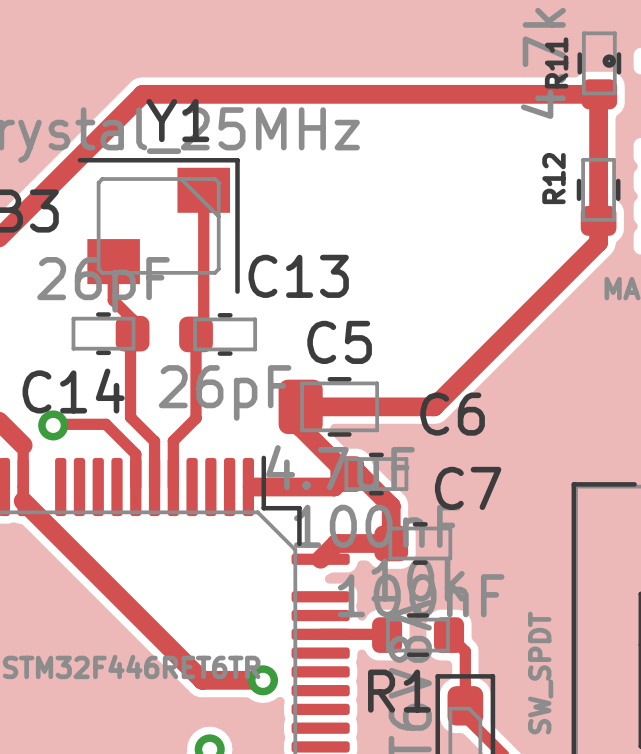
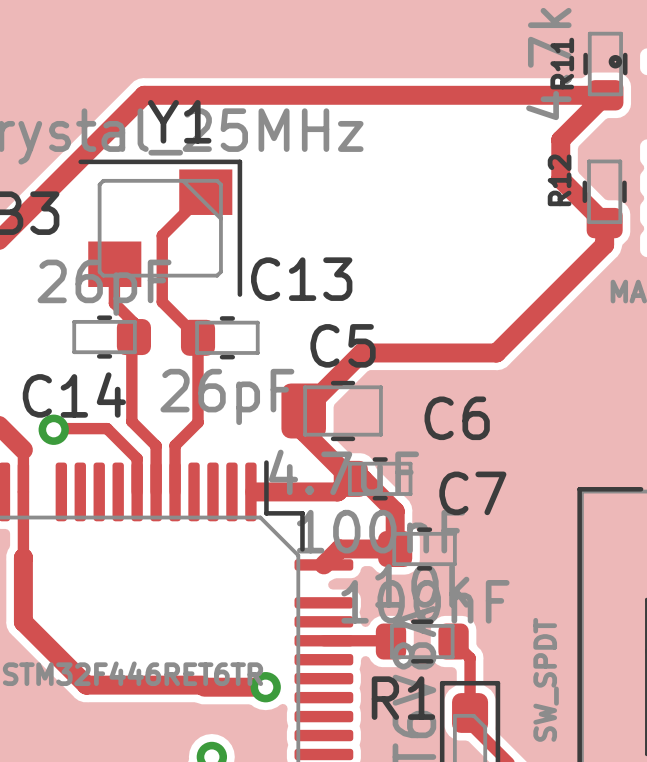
track: (598, 95) (598, 220) -> (604, 96) (560, 139) (560, 179) (604, 223)
track: (203, 190) (203, 326) (196, 334) -> (205, 192) (162, 235) (162, 302) (198, 337)
track: (491, 349) (434, 406) (300, 406) -> (496, 352) (361, 352) (303, 410)
track: (23, 501) (200, 678) -> (23, 506) (23, 622) (86, 685) (202, 685)

